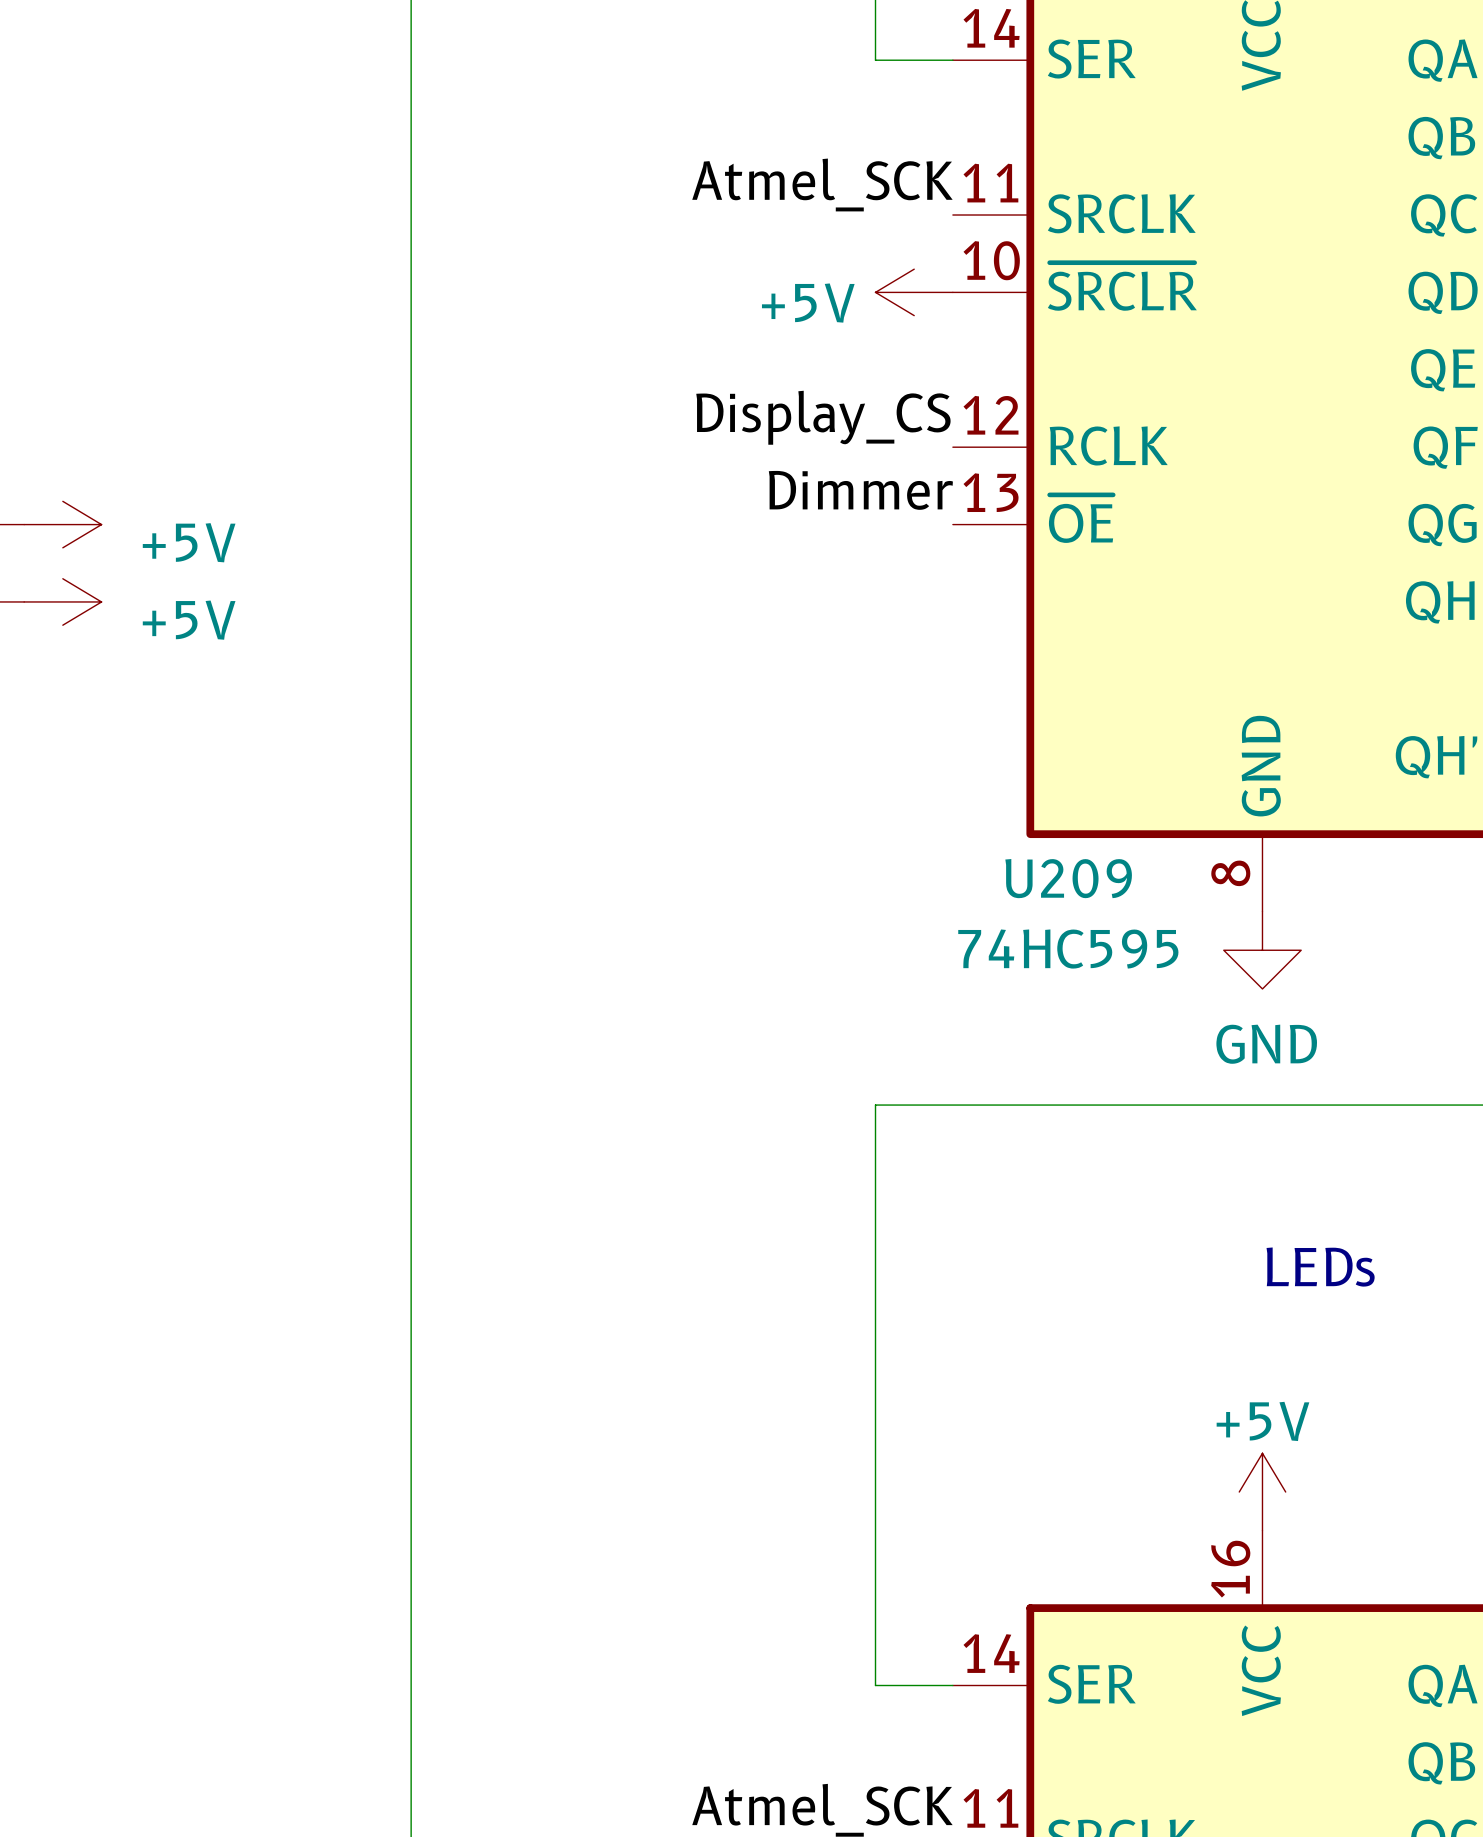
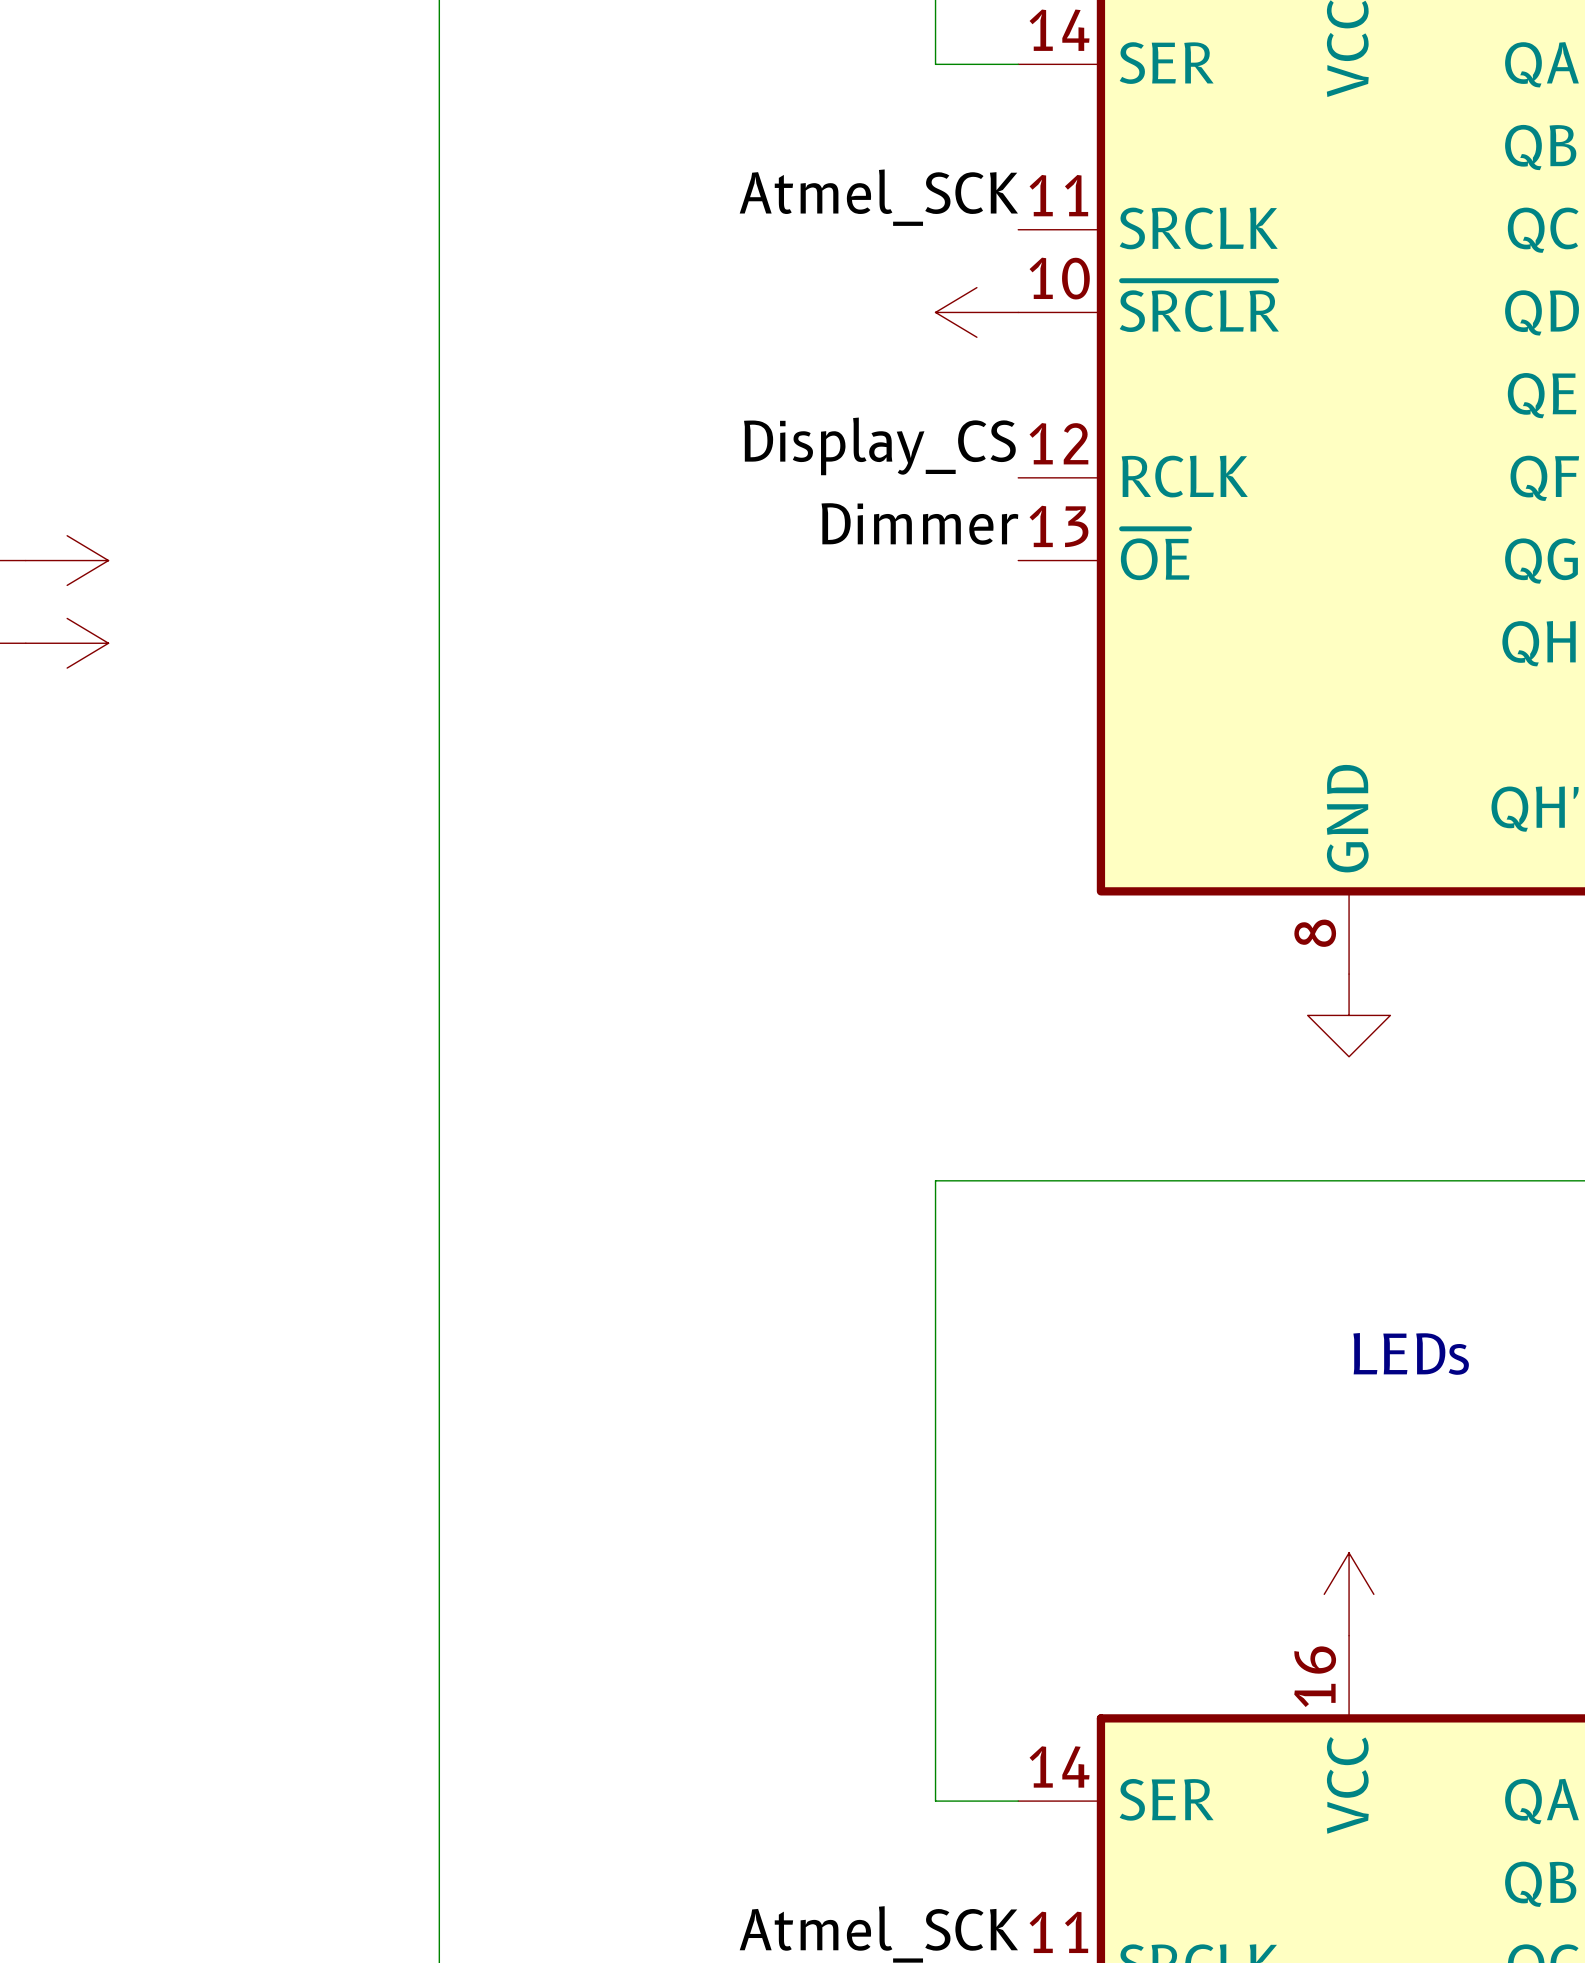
power symbol text: +5V (808, 303) -> none
power symbol text: +5V (189, 542) -> none
power symbol text: +5V (189, 620) -> none
U209 name: U209 (1068, 878) -> none
U209 value: 74HC595 (1068, 949) -> none
power symbol text: GND (1266, 1044) -> none
power symbol text: +5V (1262, 1421) -> none

